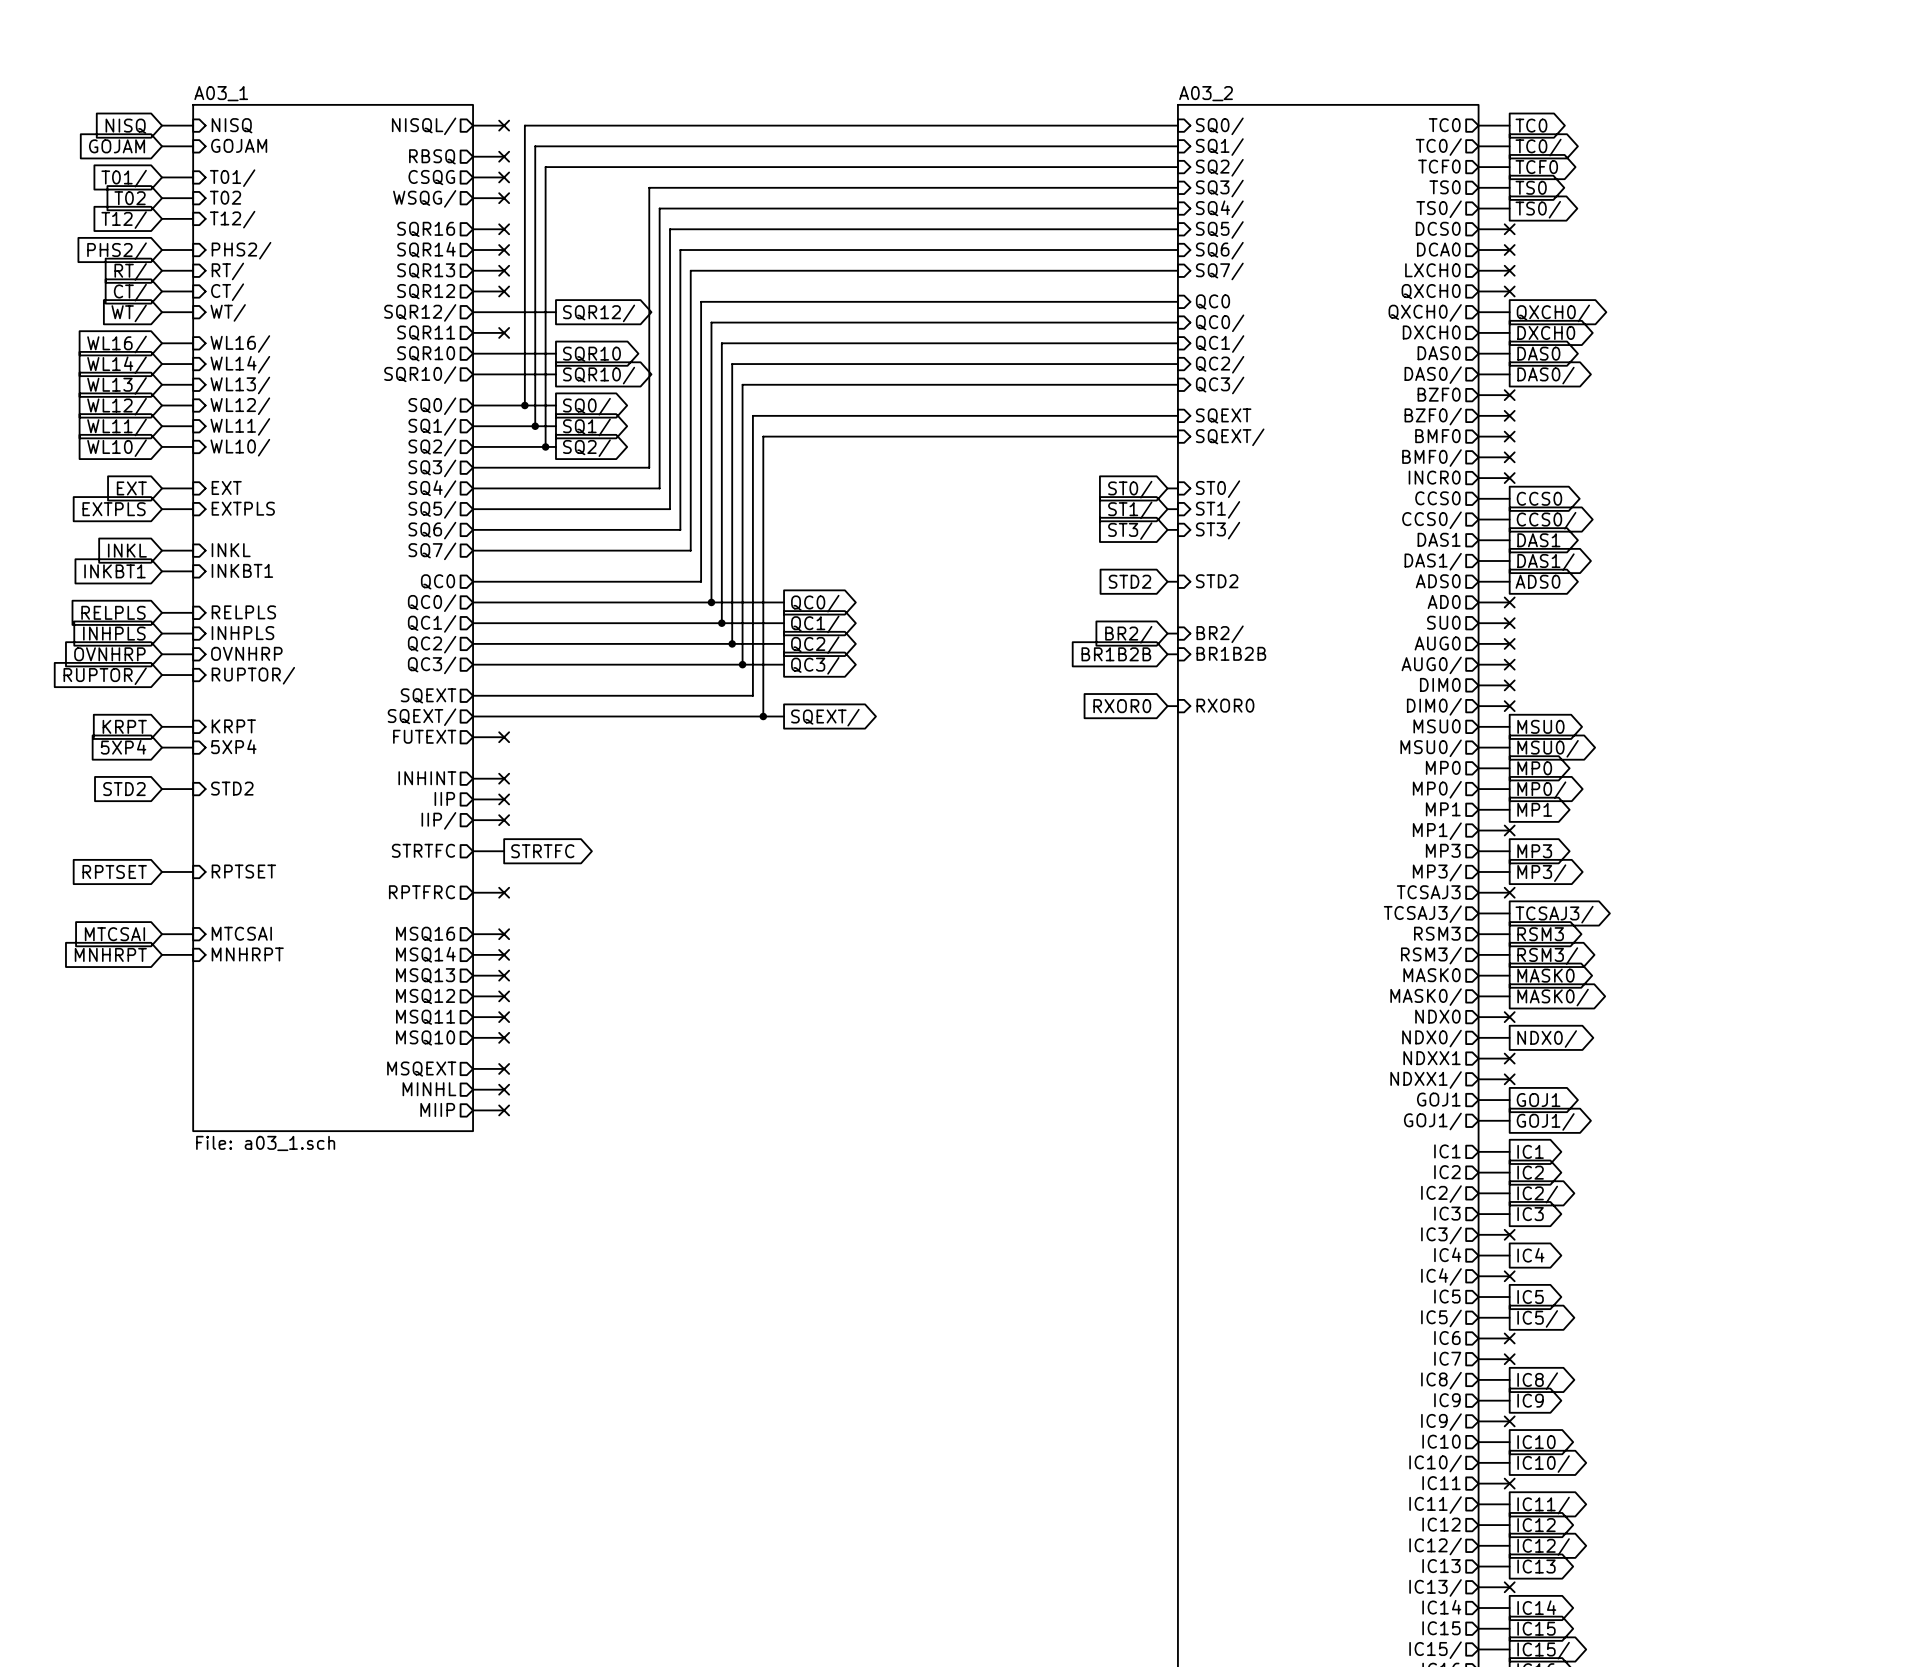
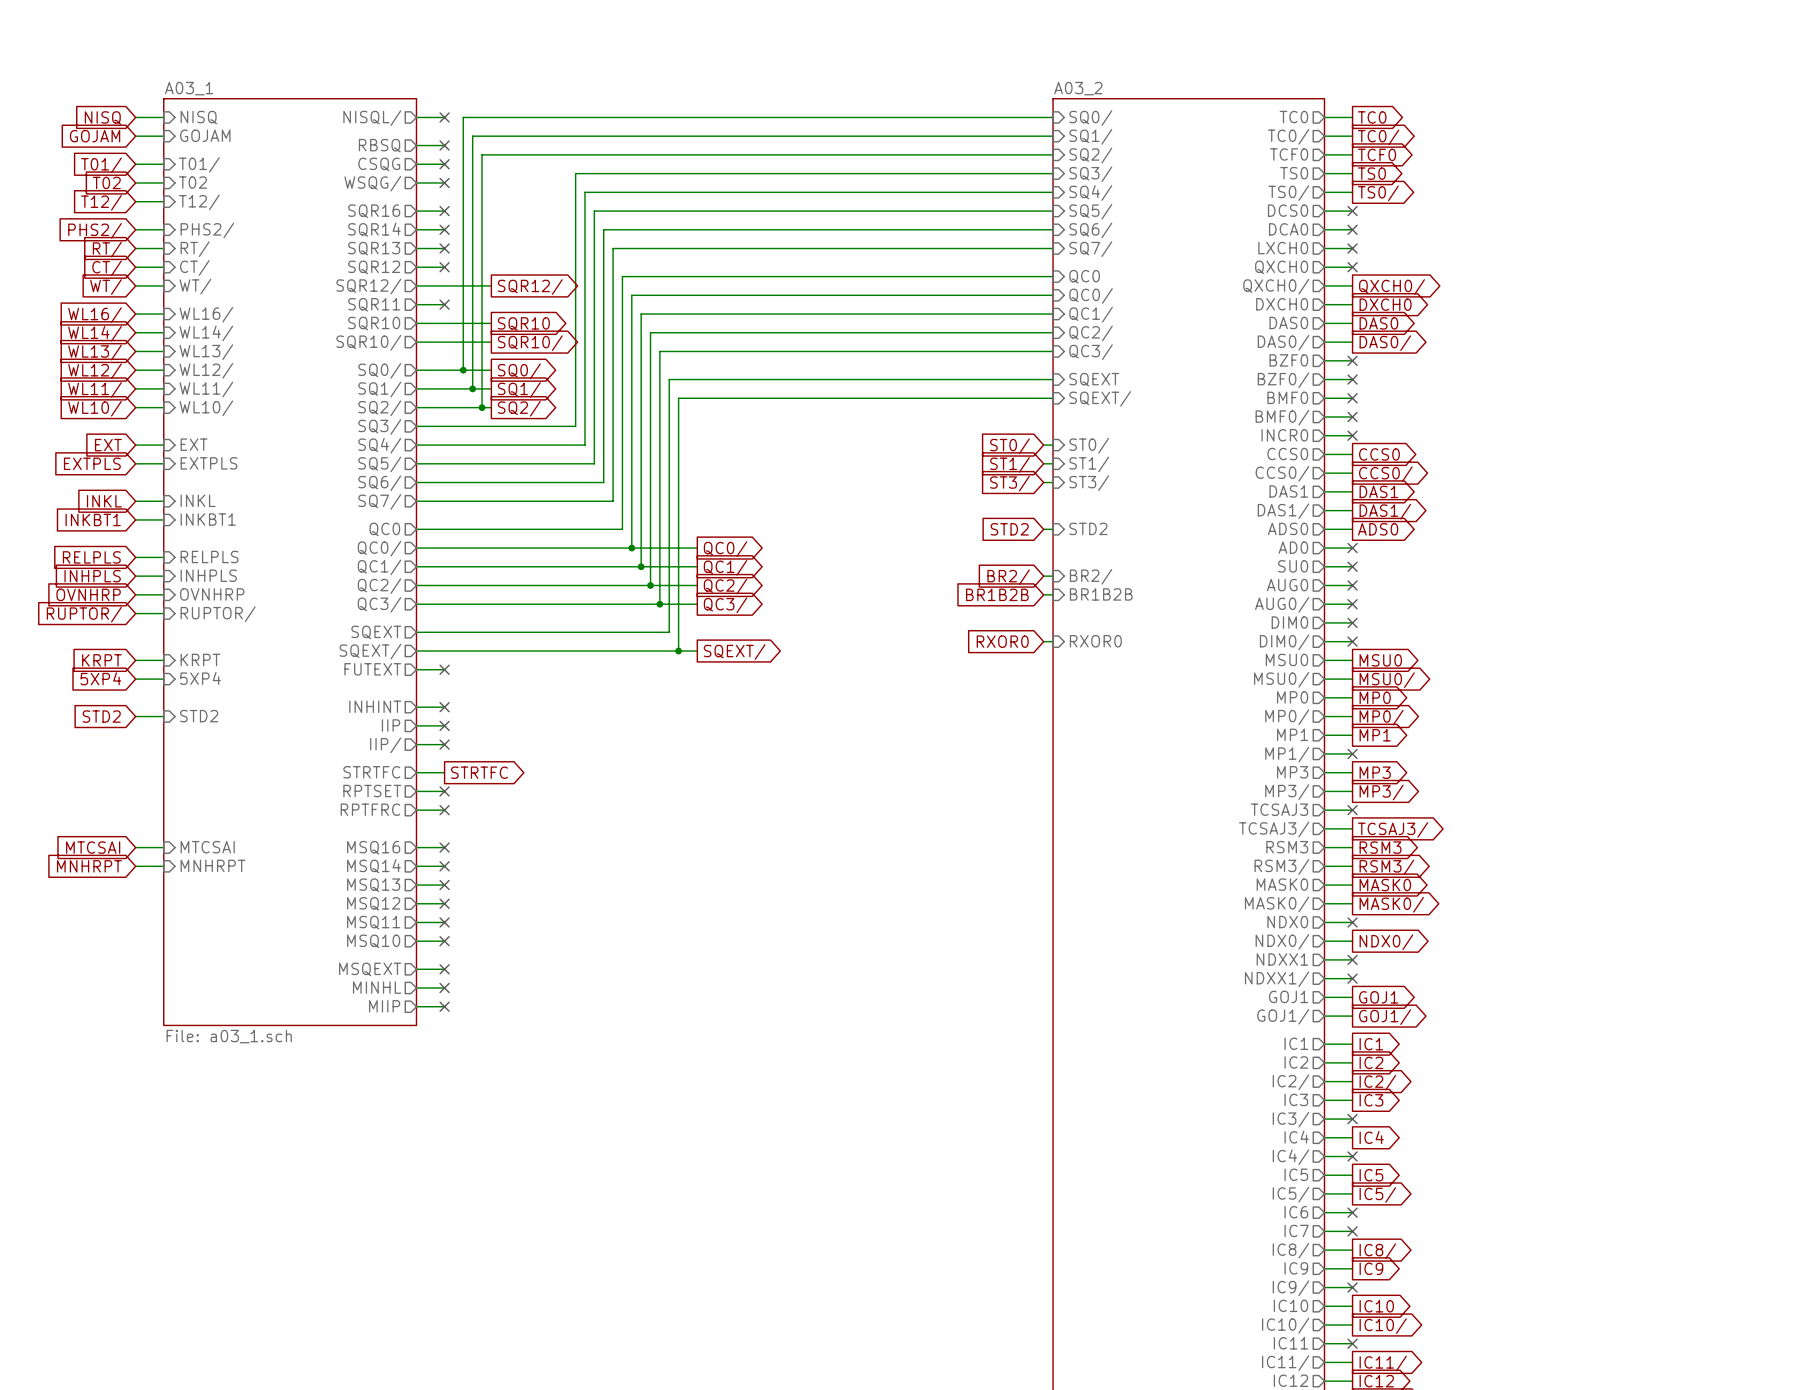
global label: RPTSET (114, 871) -> none
wire: (162, 871) (193, 871) -> none
sheet pin: RPTSET (243, 871) -> none
sheet pin: none -> RPTSET (372, 791)
wire: none -> (416, 791) (444, 791)
no-connect mark: none -> (444, 791)

